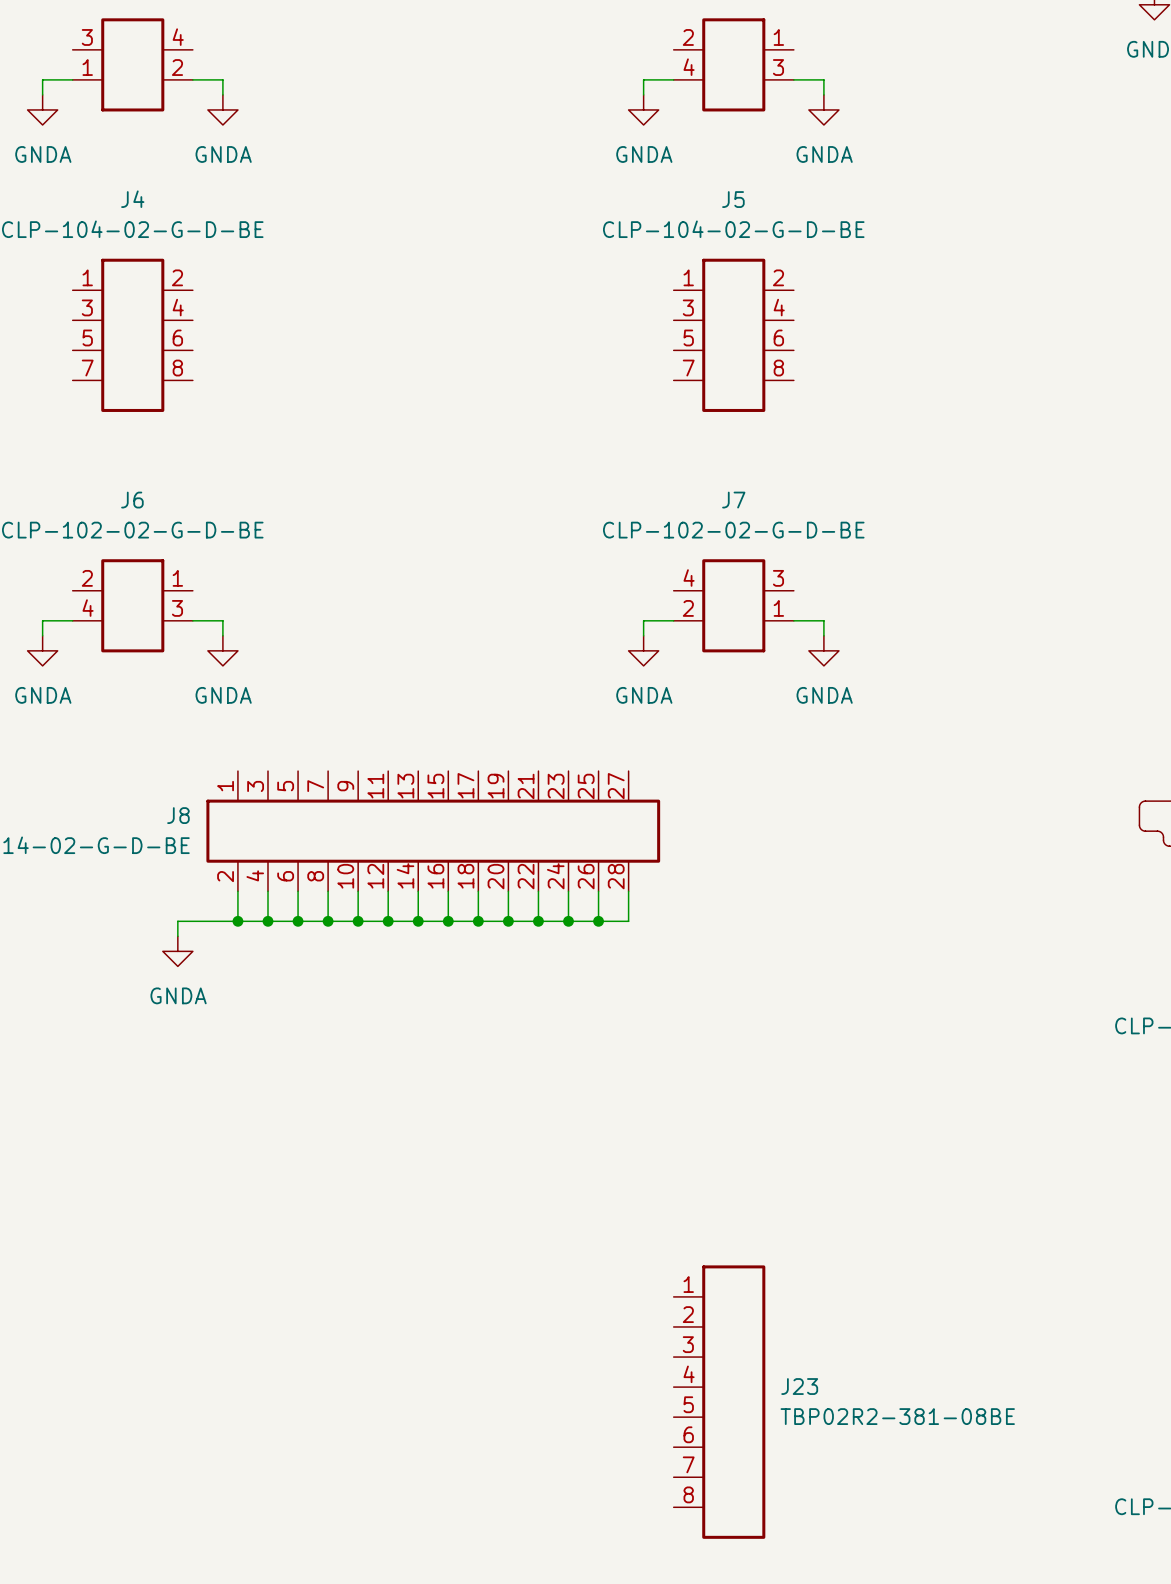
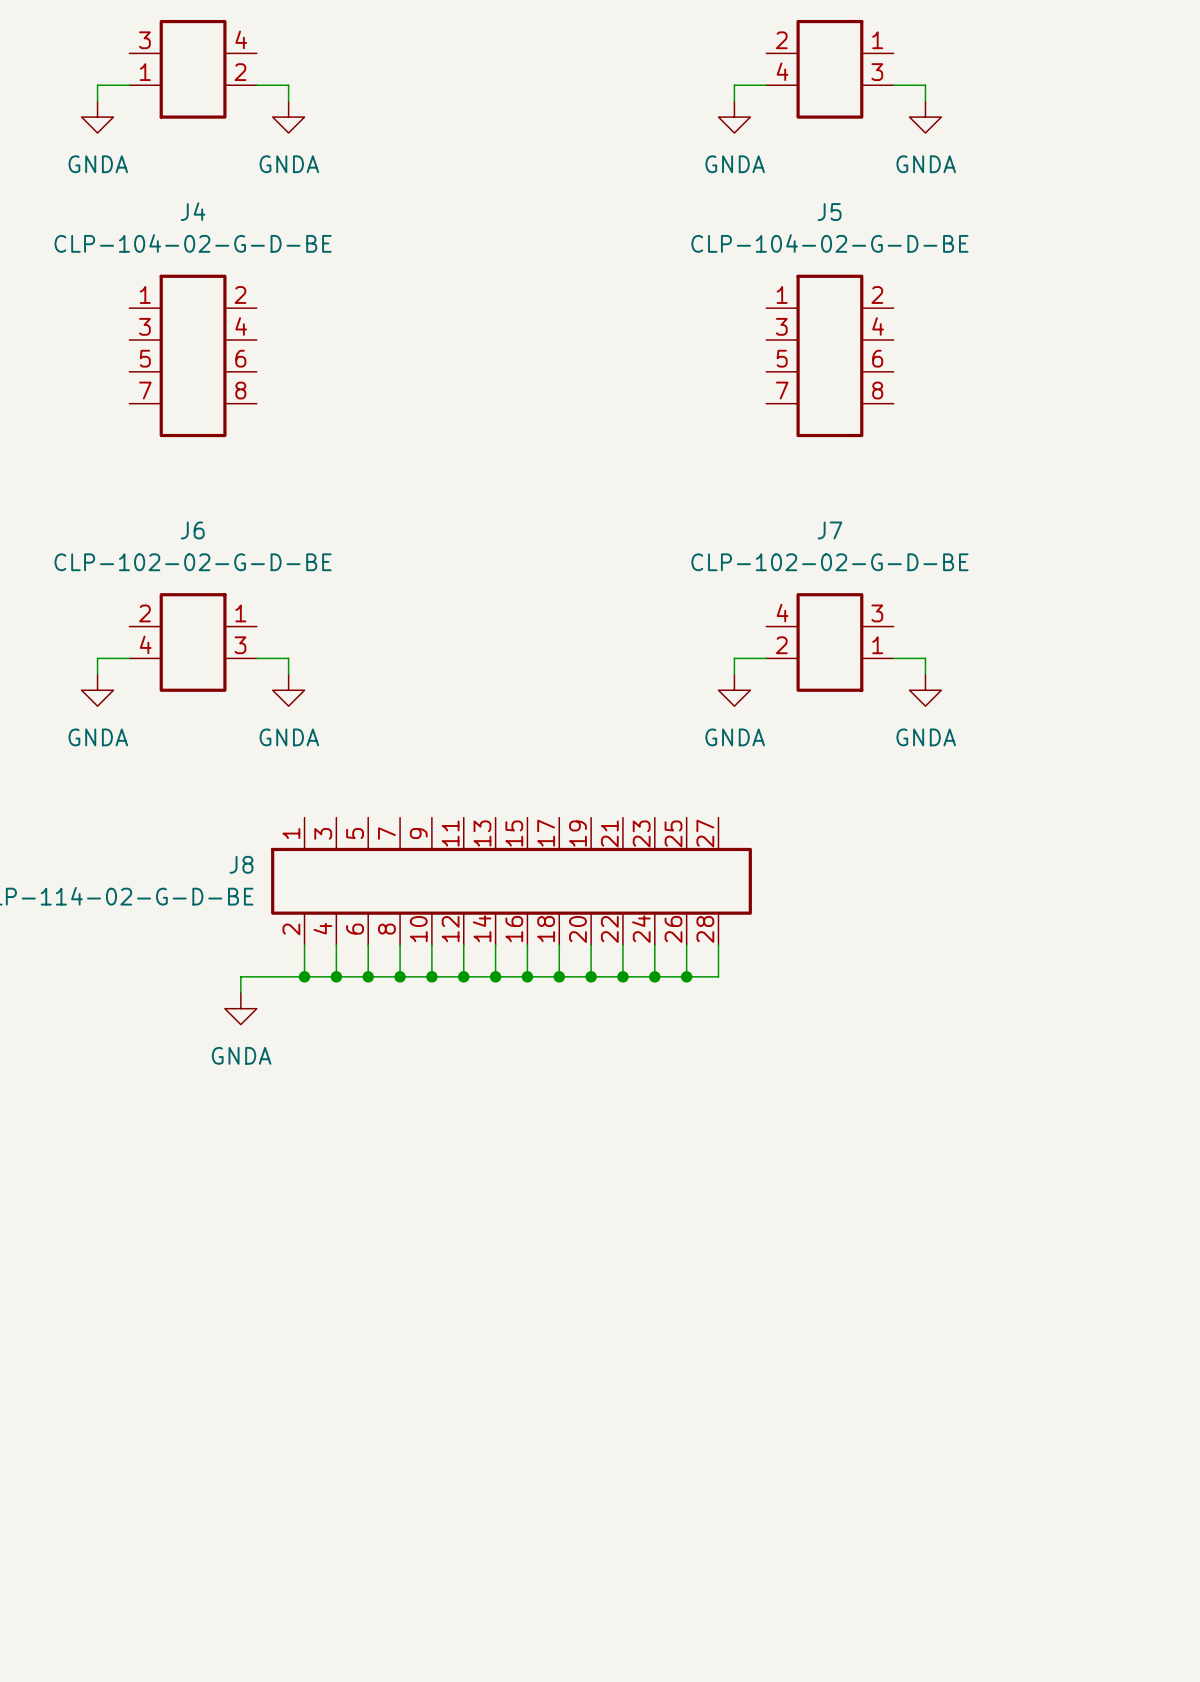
J23: TBP02R2-381-08BE (719, 1402) -> none

